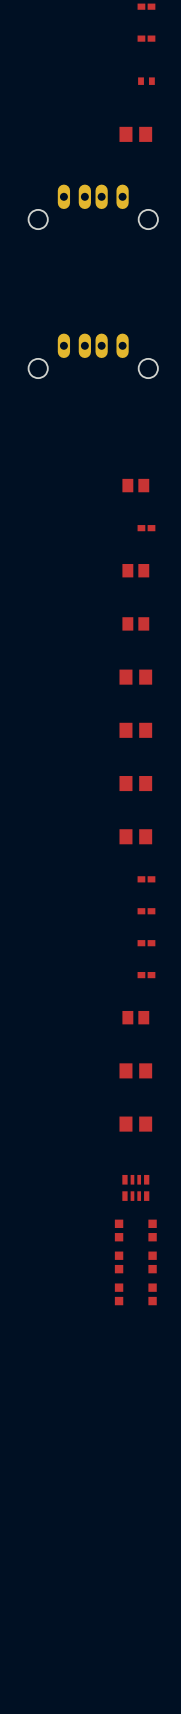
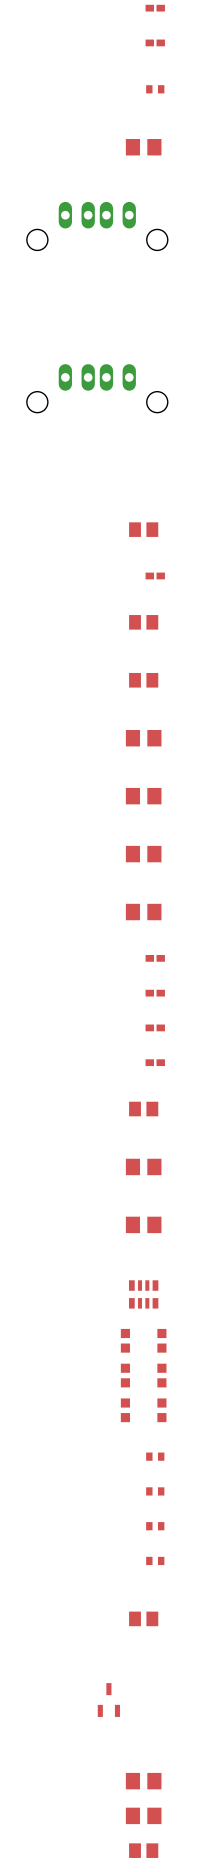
part: none -> (155, 1456)
part: none -> (155, 1491)
part: none -> (155, 1526)
part: none -> (155, 1560)
part: none -> (143, 1618)
part: none -> (108, 1700)
part: none -> (143, 1781)
part: none -> (143, 1815)
part: none -> (143, 1850)

